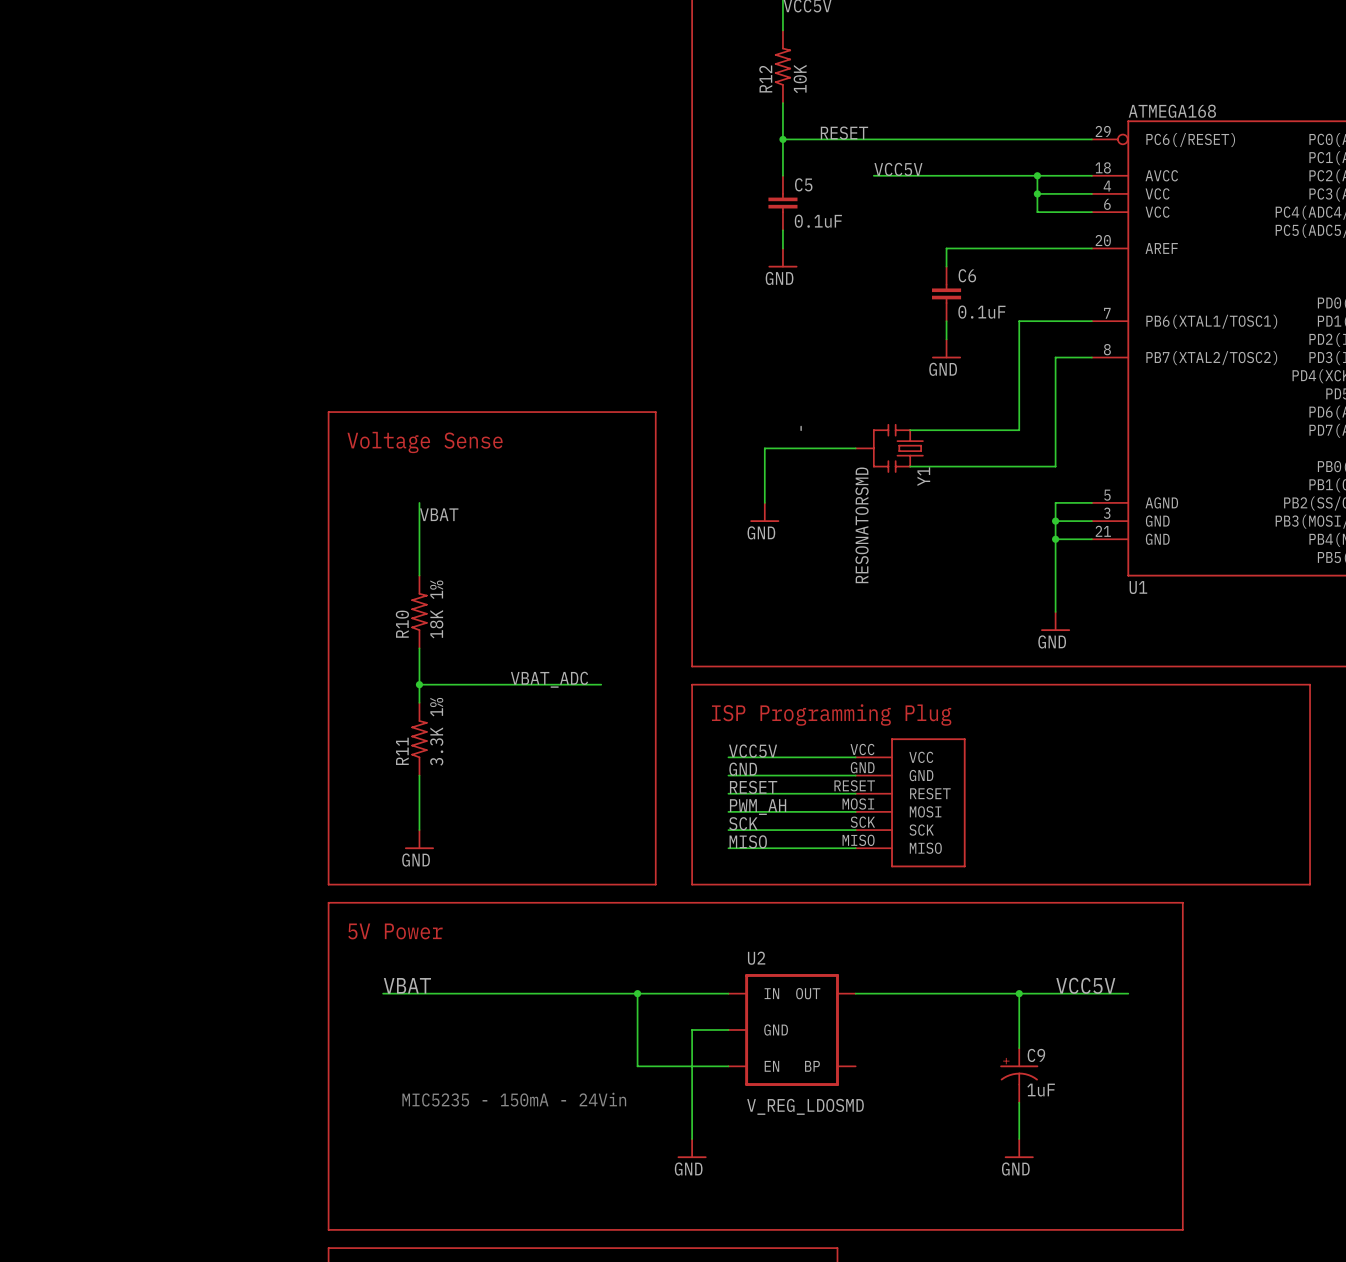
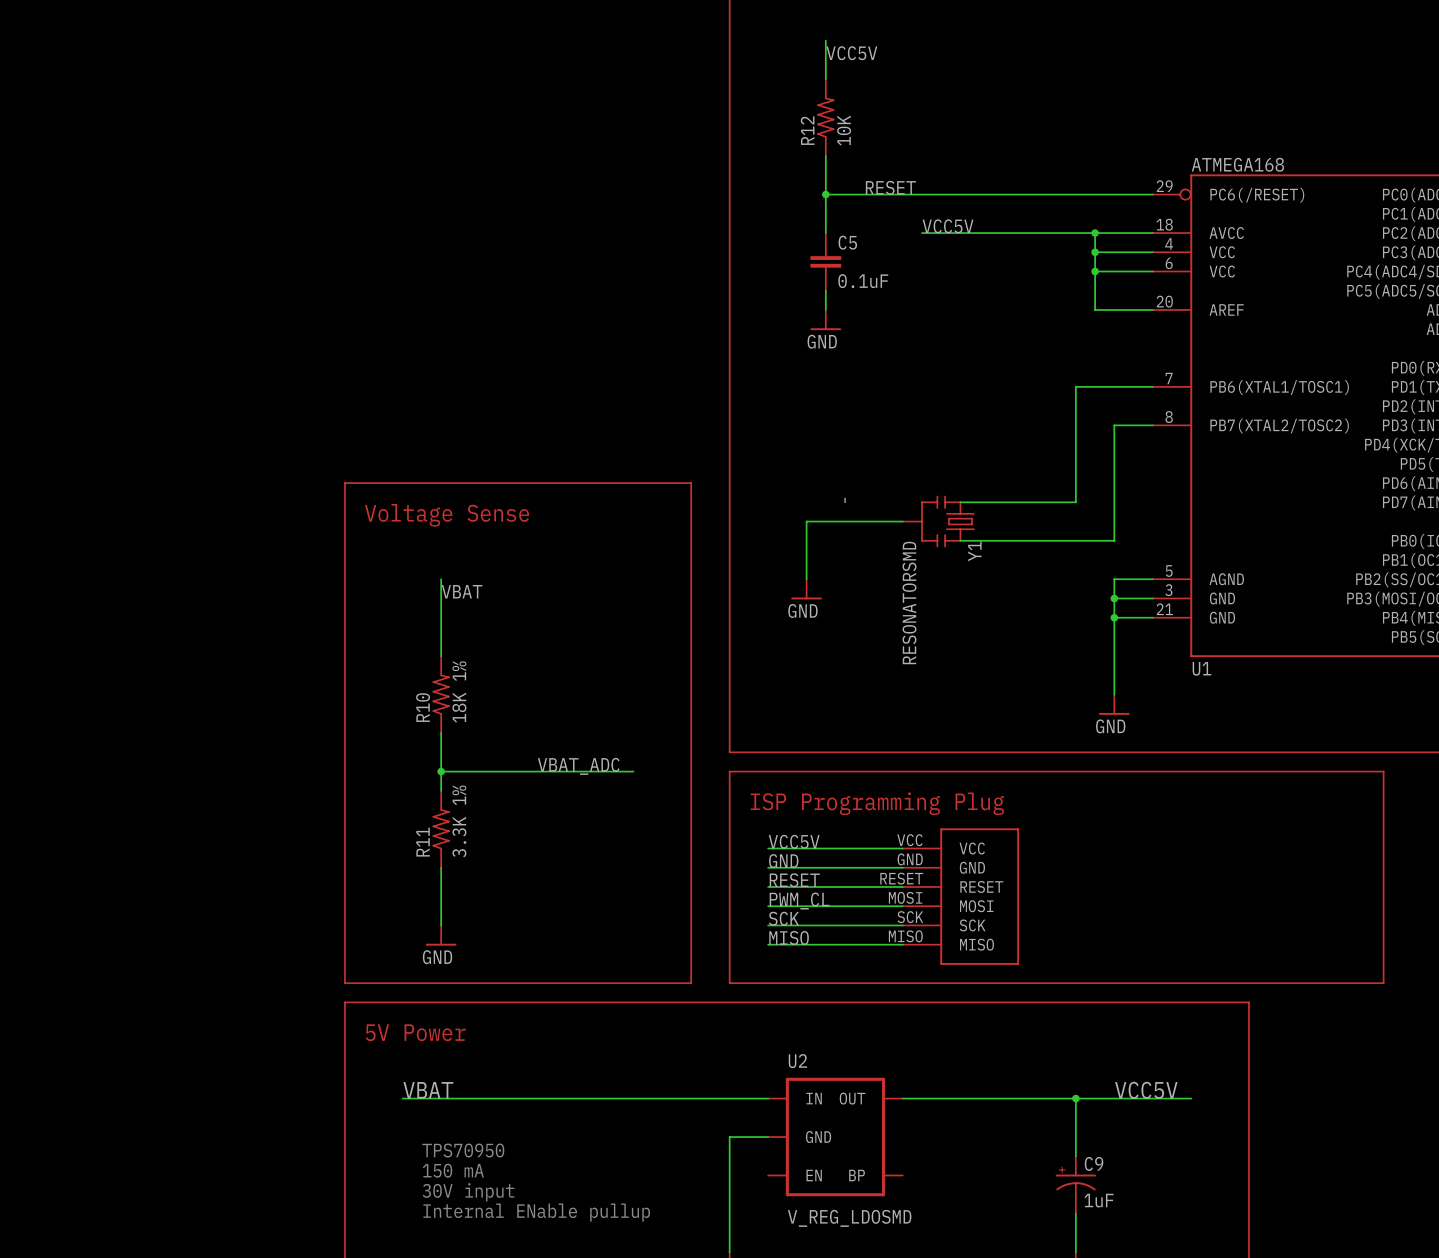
junction: none -> (1095, 271)
wire: (1037, 248) (946, 248) (946, 266) -> (1095, 309) (1095, 271)
C6: 0.1uF (946, 293) -> none
wire: (946, 321) (946, 339) -> none
power symbol: GND (946, 348) -> none
label: PWM_AH (758, 807) -> PWM_CL (799, 901)
wire: (637, 993) (637, 1066) (728, 1066) -> none
junction: (637, 993) -> none
text: none -> TPS70950 (463, 1150)
text: none -> 150 mA (453, 1170)
text: none -> 30V input (468, 1192)
text: MIC5235 - 150mA - 24Vin (514, 1099) -> Internal ENable pullup (536, 1212)

